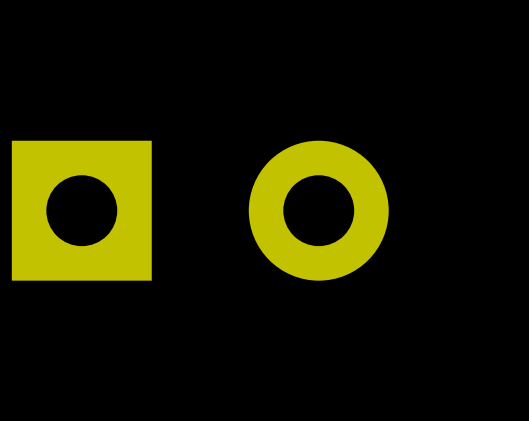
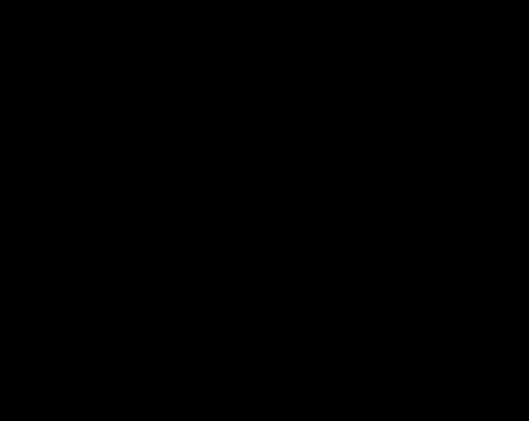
part: (200, 210) -> none

